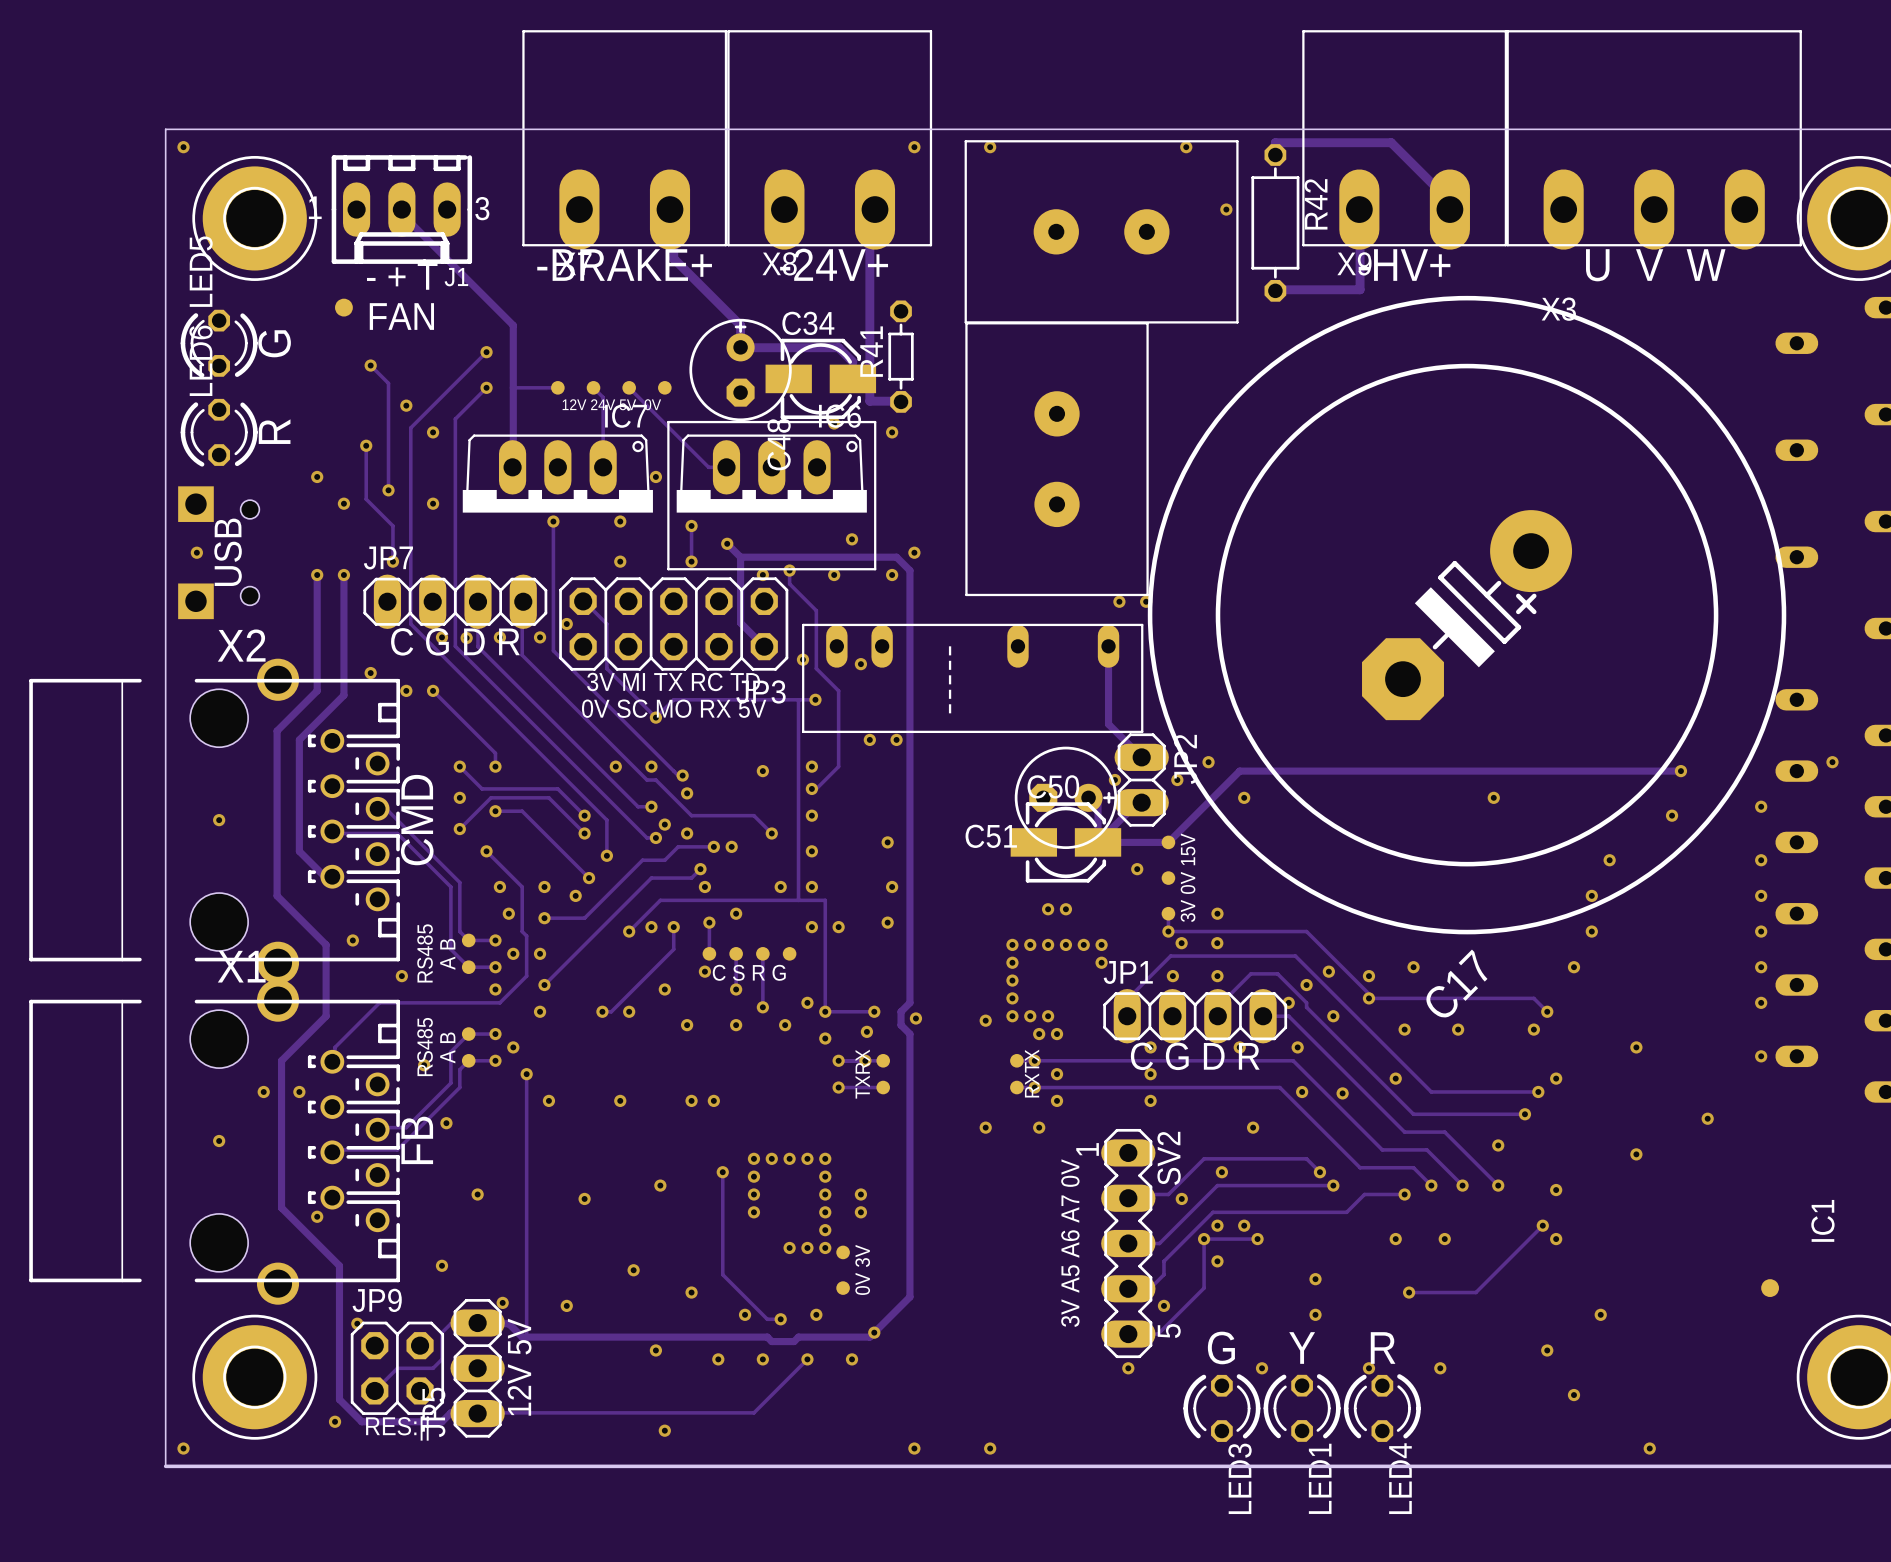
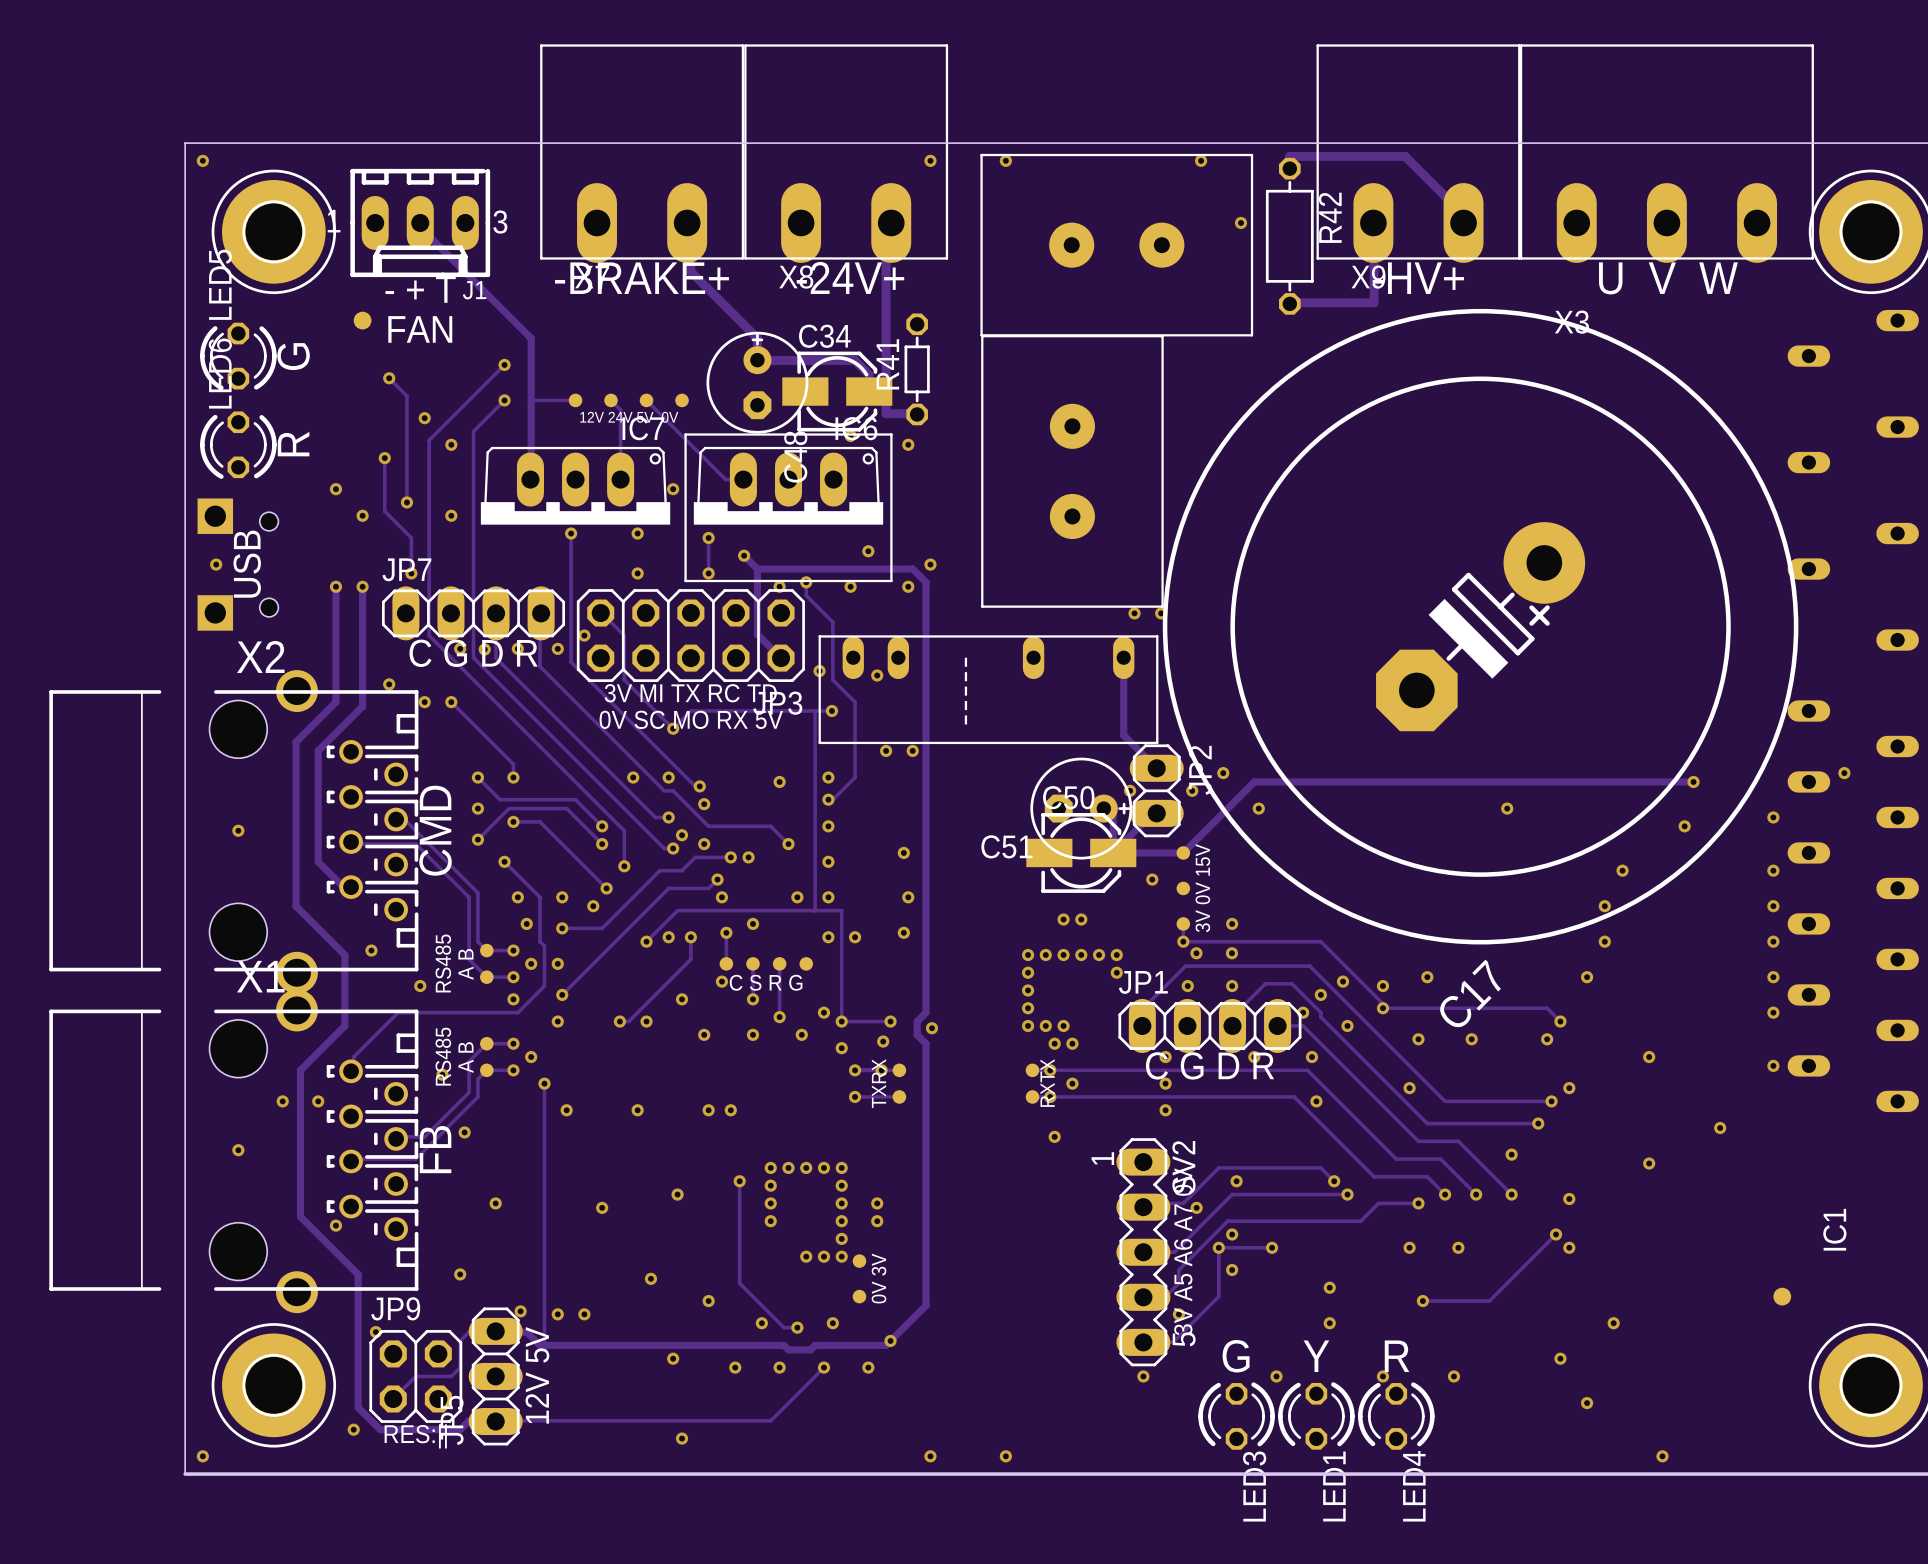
via: (985, 1020) -> none
via: (1342, 1093) -> none
via: (1057, 1100) -> none
via: (985, 1127) -> none
via: (1253, 1127) -> none
via: (1244, 1225) -> none
text position: 3V A5 A6 A7 0V (1070, 1243) -> 3V A5 A6 A7 0V (1183, 1251)
via: none -> (557, 1314)

